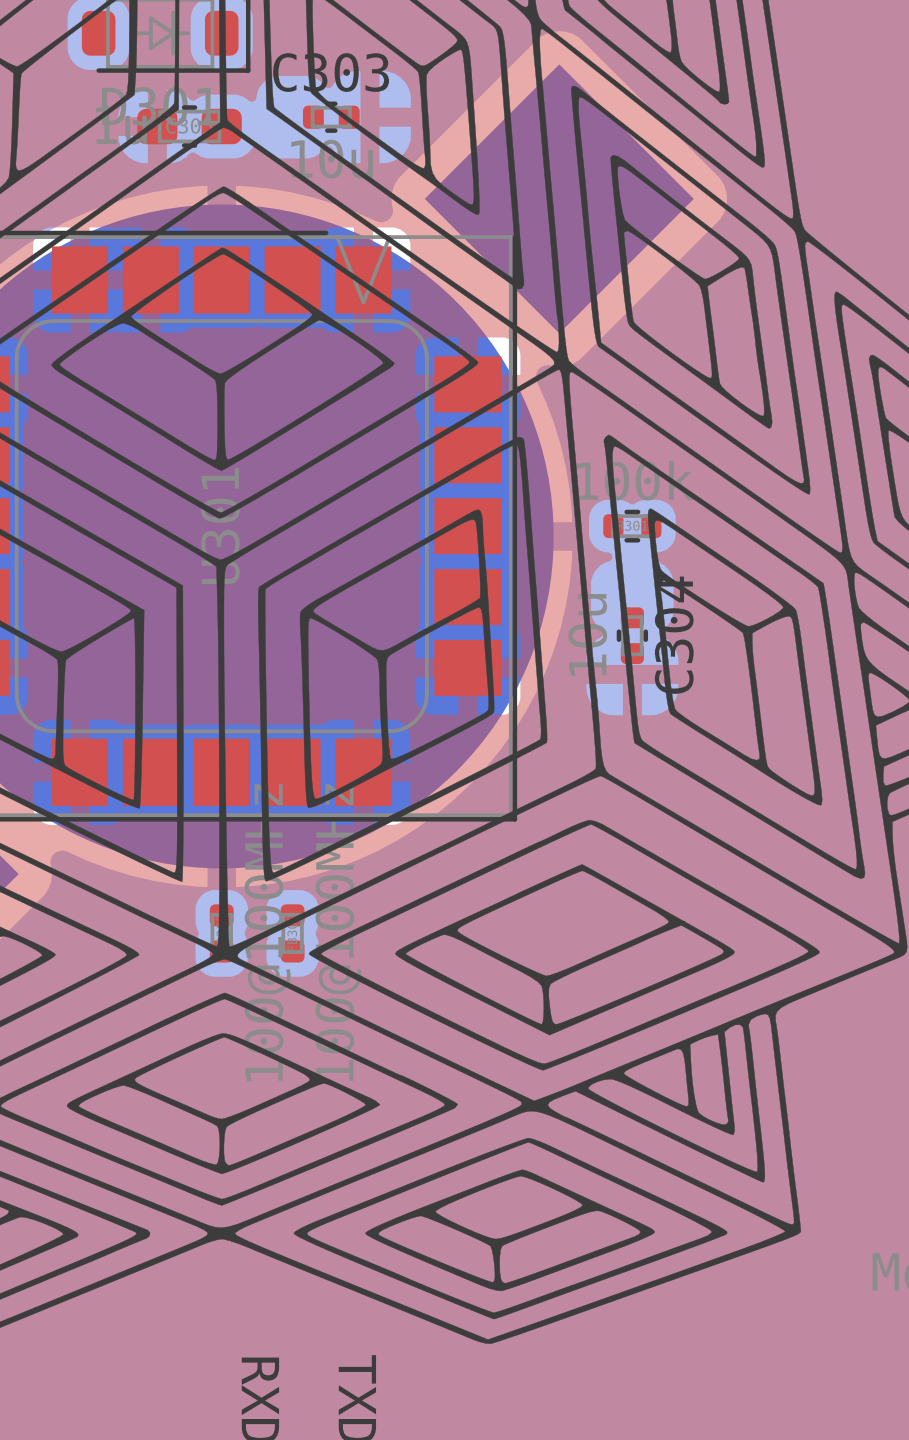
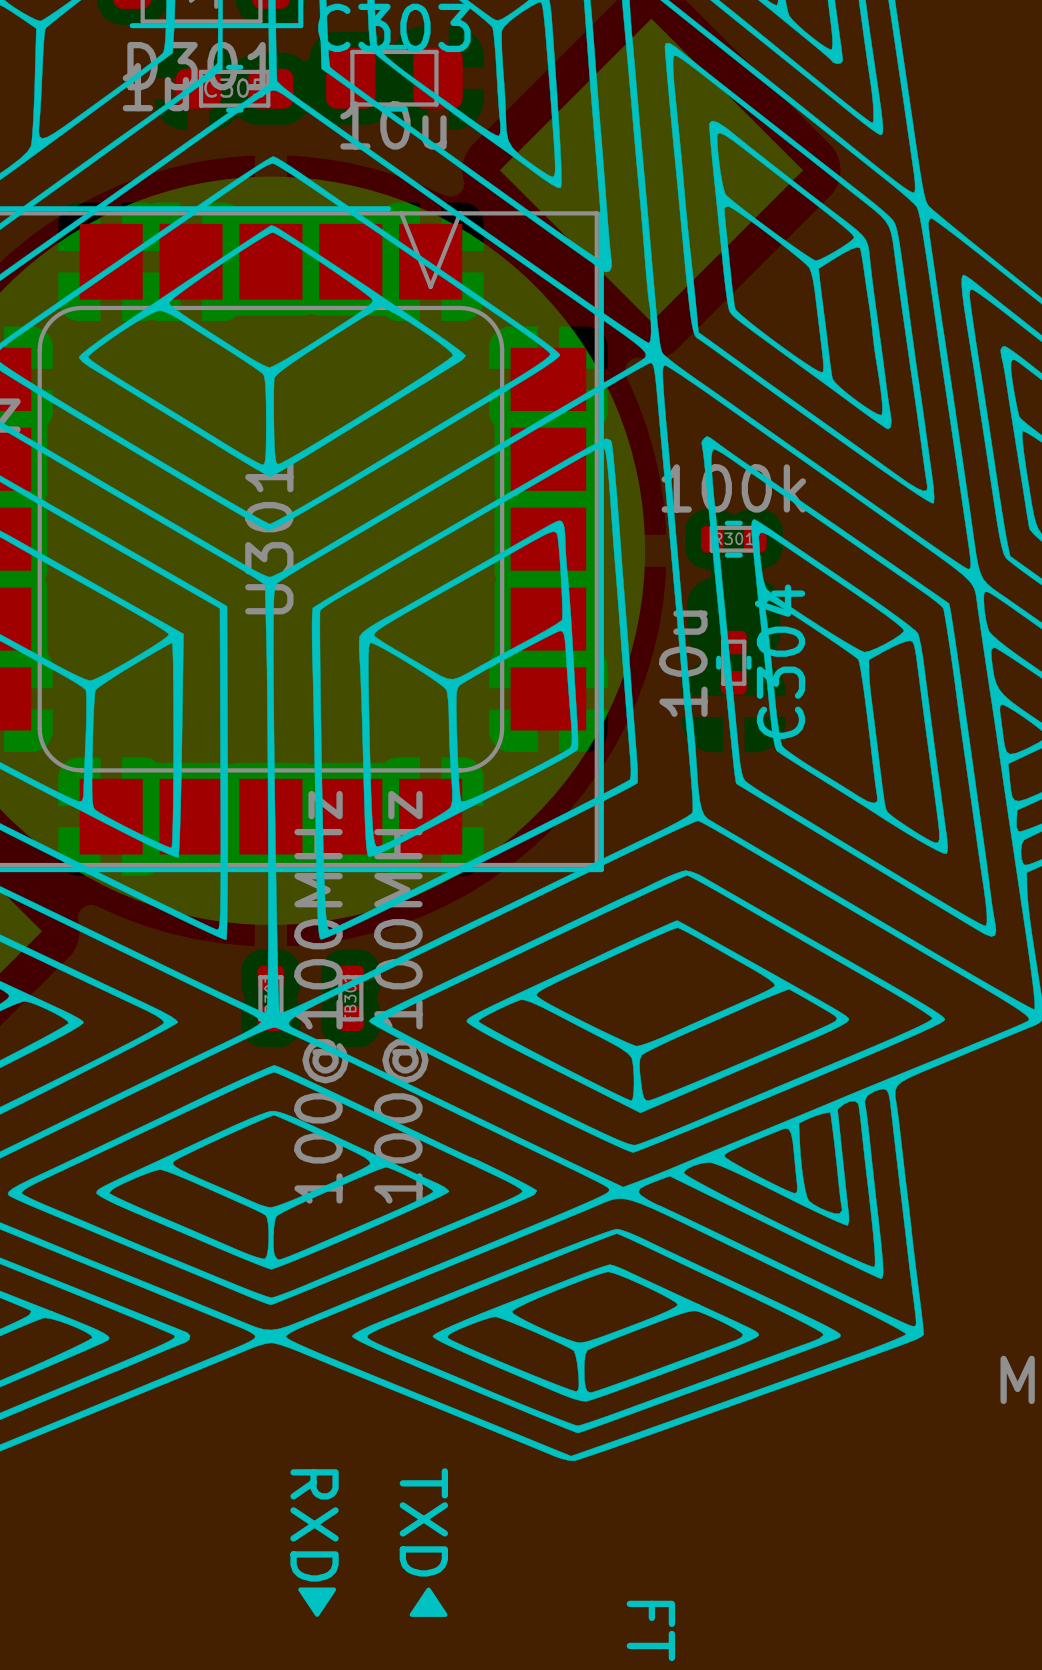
C303 footprint: [302, 101, 360, 133] -> [326, 44, 463, 112]

